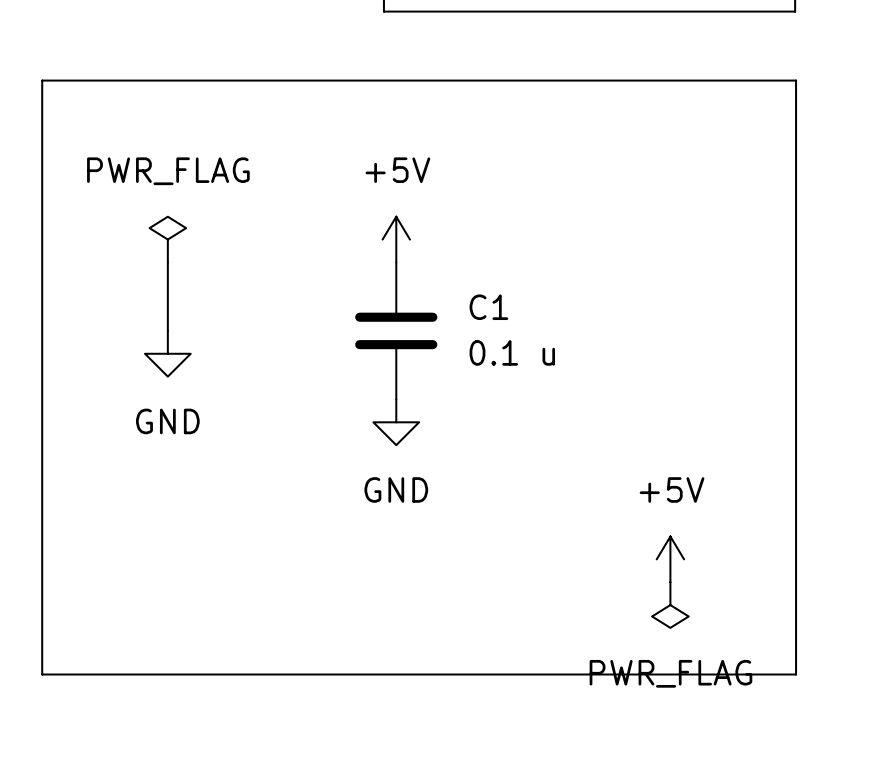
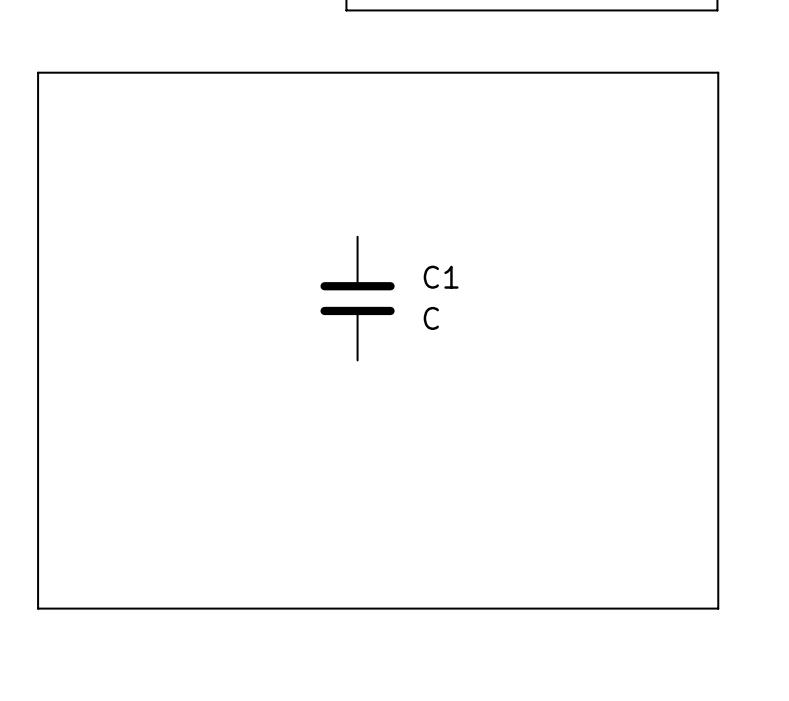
power symbol: PWR_FLAG (167, 239) -> none
power symbol: +5V (396, 239) -> none
wire: (167, 262) (167, 330) -> none
C1 value: 0.1 u (512, 352) -> C (431, 318)
power symbol: GND (167, 353) -> none
power symbol: GND (396, 422) -> none
power symbol: +5V (670, 559) -> none
power symbol: PWR_FLAG (670, 605) -> none

